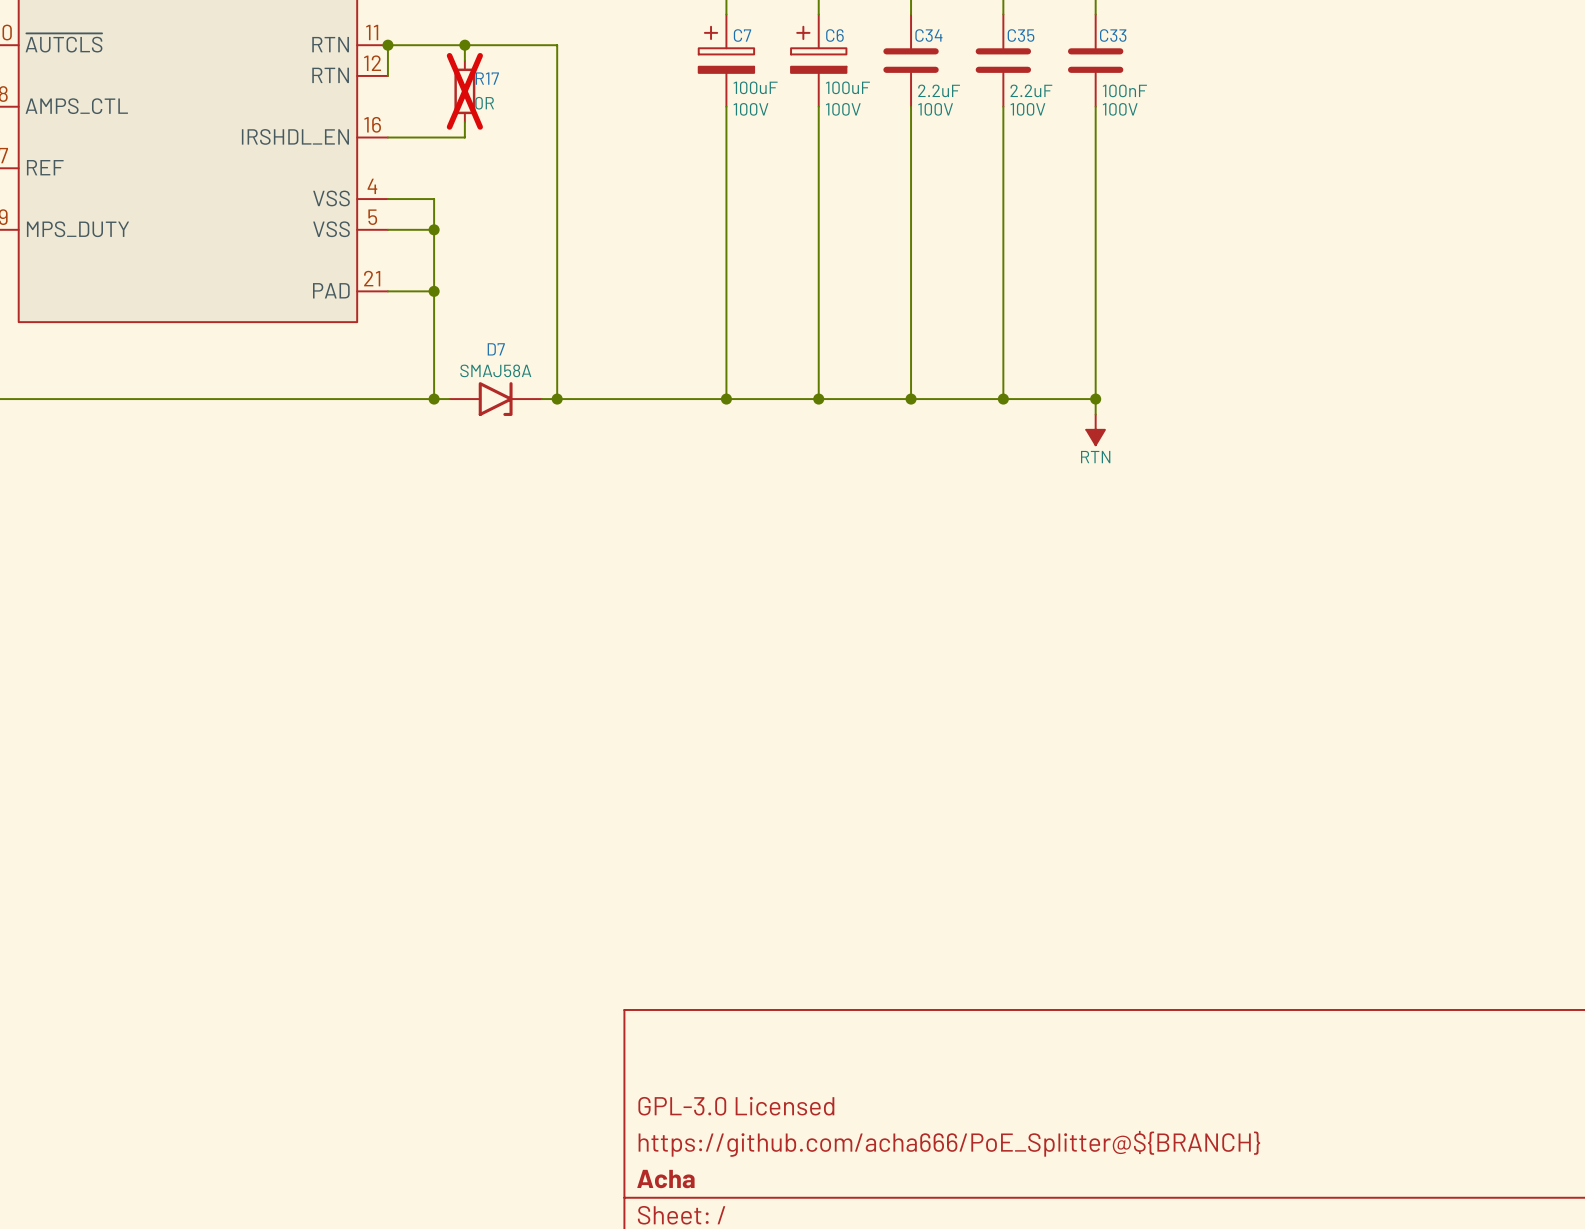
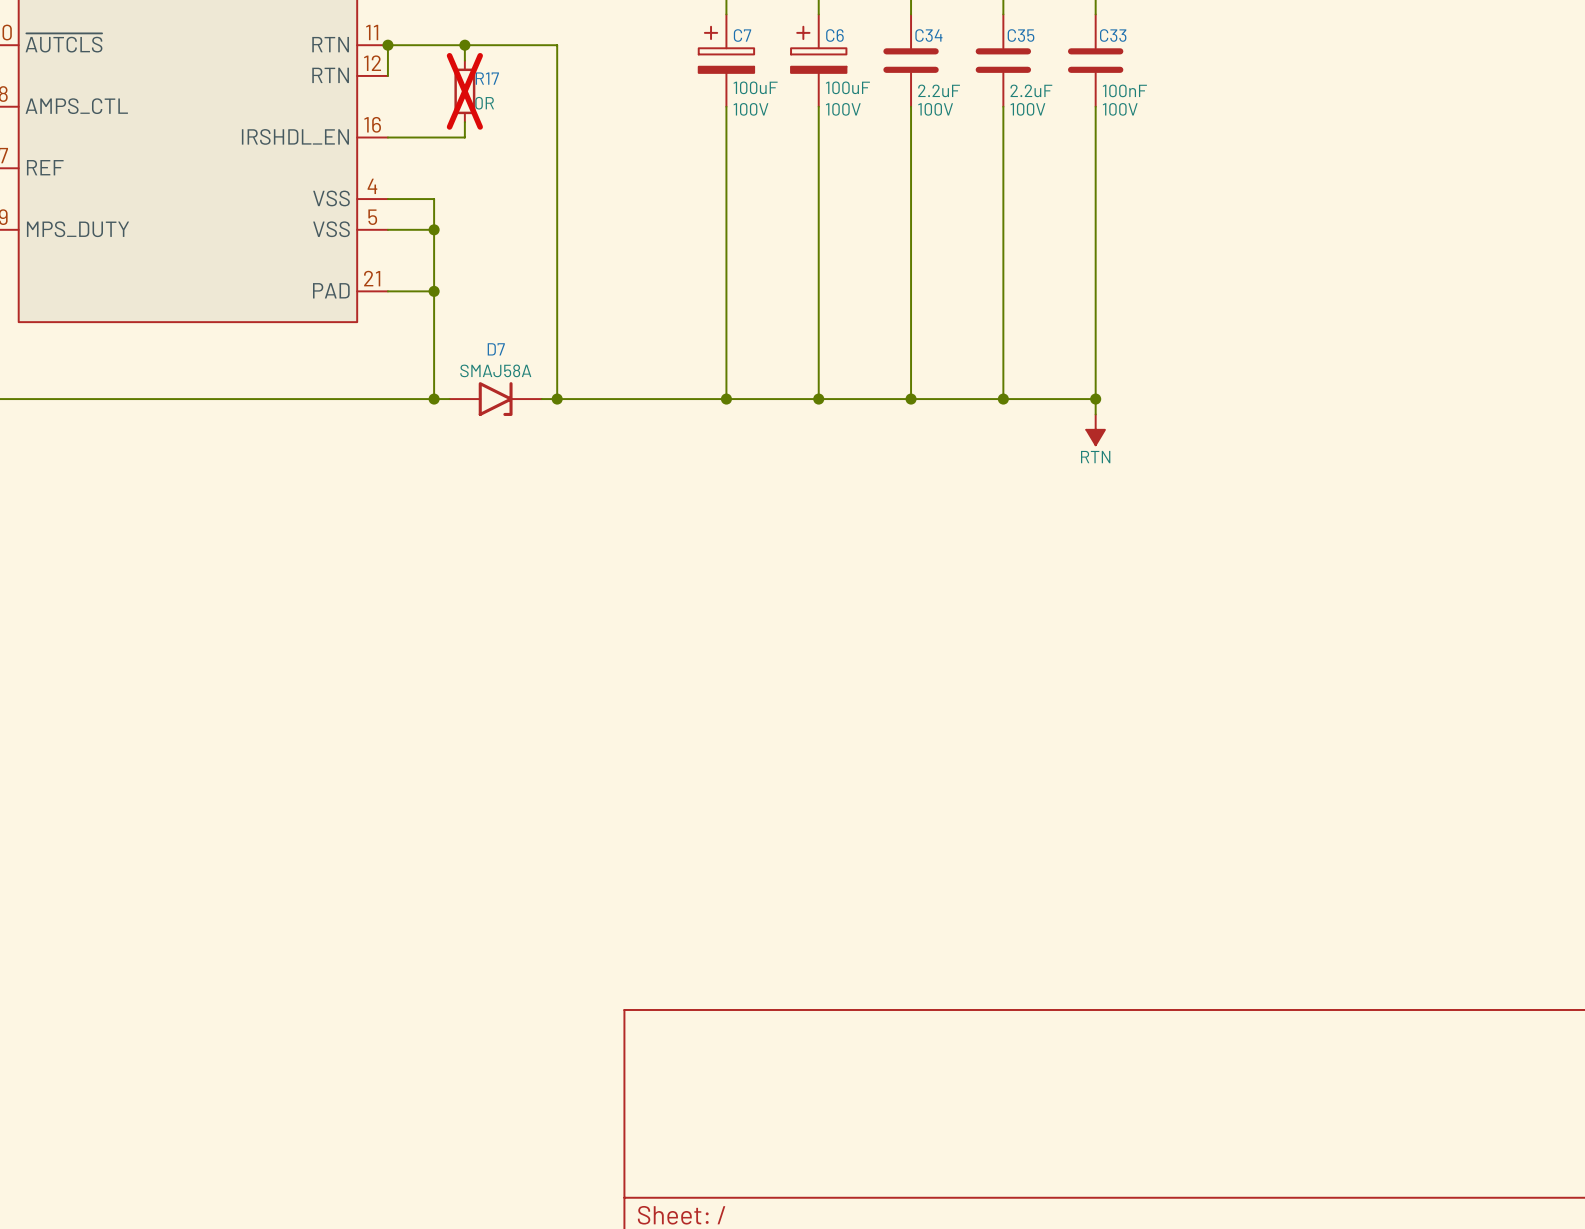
title block: GPL-3.0 Licensed (736, 1106) -> none
title block: https://github.com/acha666/PoE_Splitter@${BRANCH} (949, 1143) -> none
title block: Acha (665, 1179) -> none

